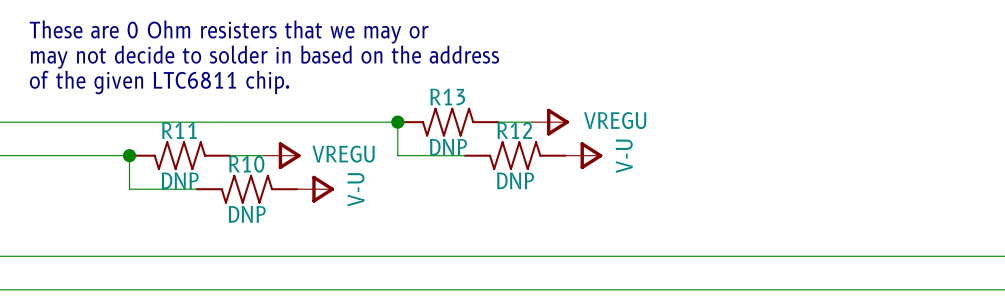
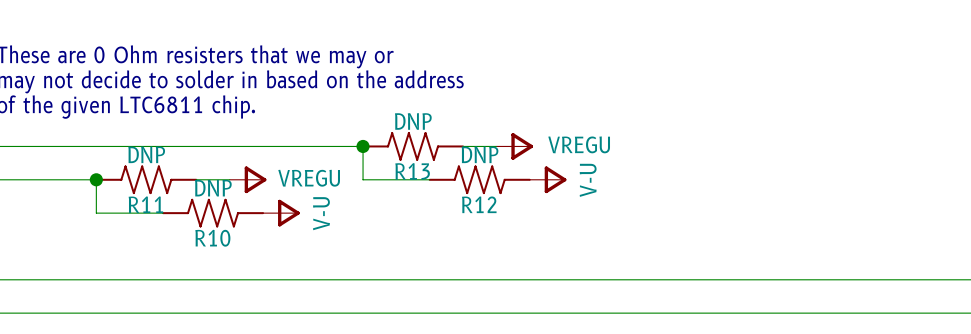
R13 name position: R13 (447, 97) -> R13 (412, 171)
R13 flip: as is (448, 122) -> left-right (413, 146)
R11 name position: R11 (179, 130) -> R11 (145, 204)
R12 name position: R12 (514, 130) -> R12 (479, 204)
R13 text position: DNP (448, 147) -> DNP (413, 121)
R11 flip: as is (179, 155) -> left-right (146, 179)
R12 flip: as is (515, 155) -> left-right (479, 179)
R10 name position: R10 (246, 164) -> R10 (212, 238)
R11 text position: DNP (180, 180) -> DNP (146, 154)
R12 text position: DNP (515, 180) -> DNP (480, 154)
R10 flip: as is (246, 189) -> left-right (213, 213)
R10 text position: DNP (247, 214) -> DNP (213, 188)

